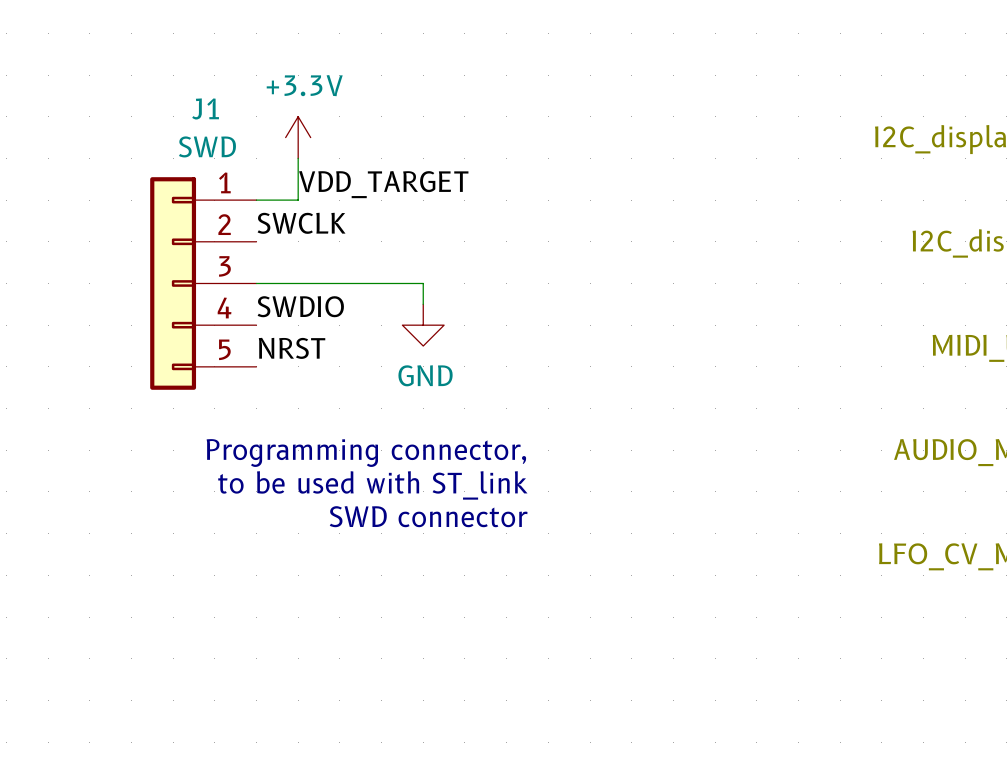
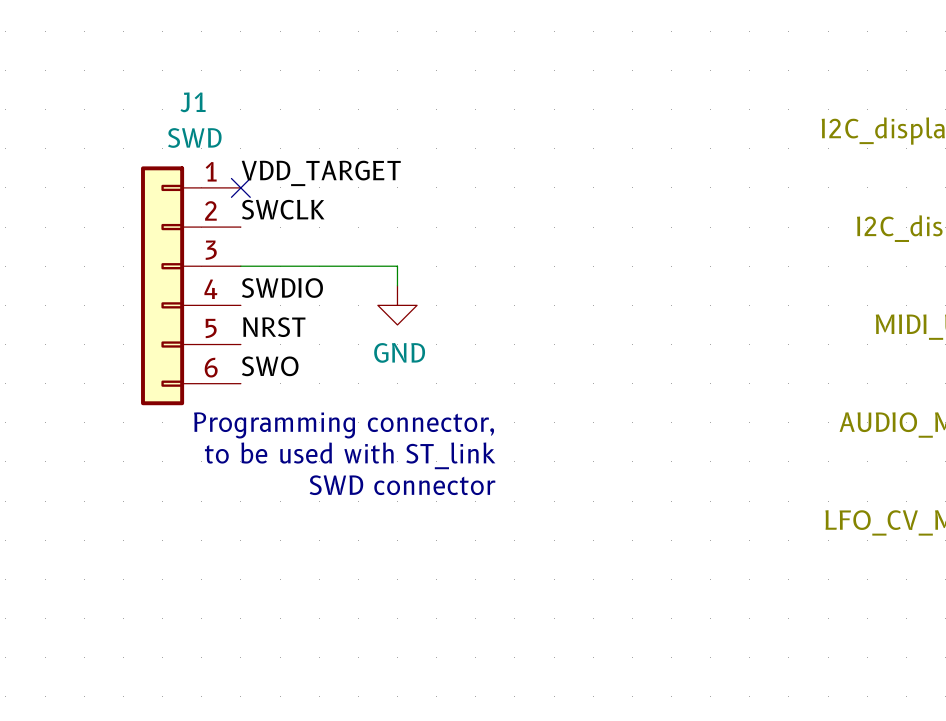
power symbol: +3.3V (298, 137) -> none
wire: (298, 158) (298, 200) (256, 200) -> none
J1 symbol: [150, 177, 257, 390] -> [141, 166, 241, 406]
label position: VDD_TARGET (383, 184) -> VDD_TARGET (321, 173)
no-connect mark: none -> (240, 187)
label: none -> SWO (270, 366)

